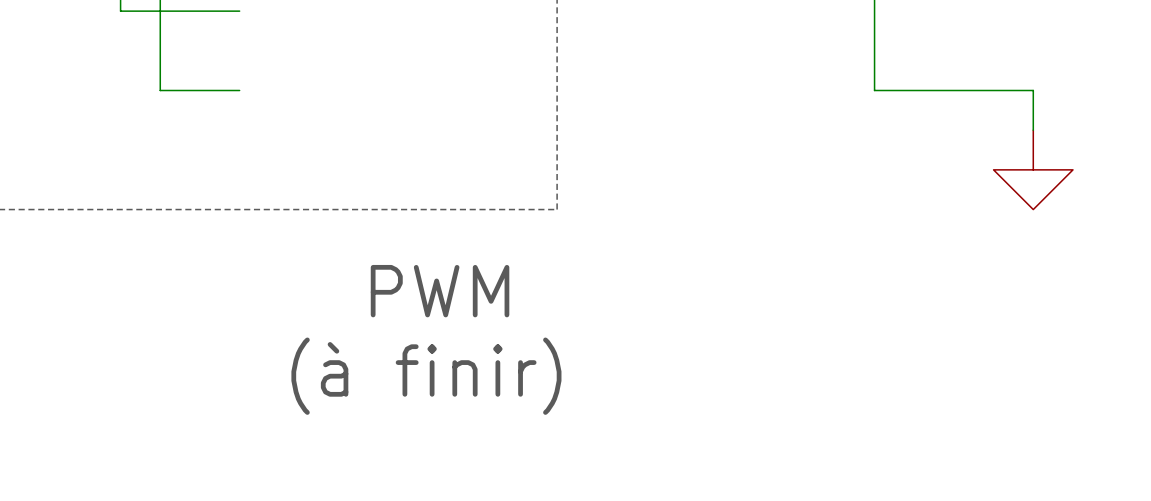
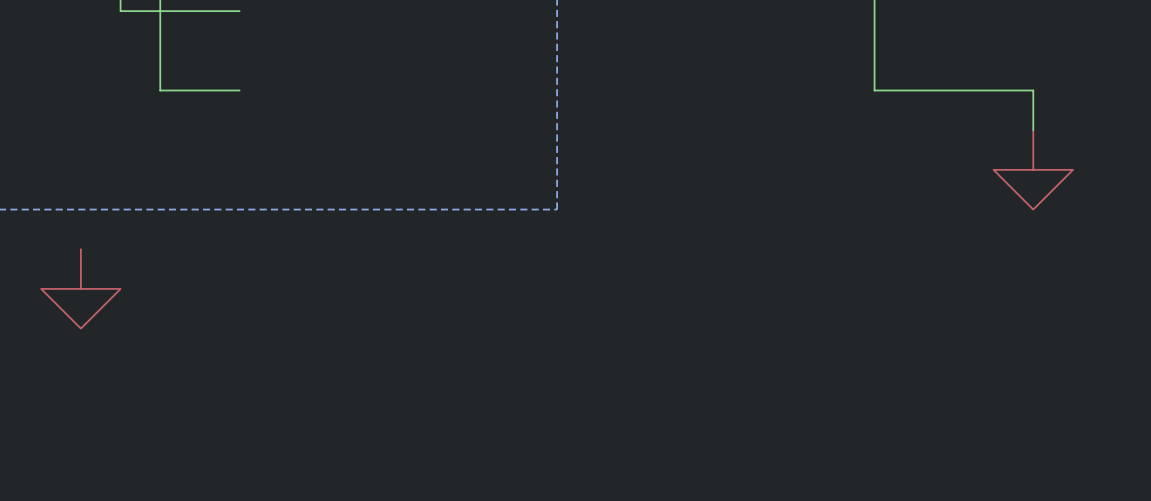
power symbol: none -> (80, 288)
text: PWM (440, 291) -> none
text: (à finir) (426, 376) -> none

